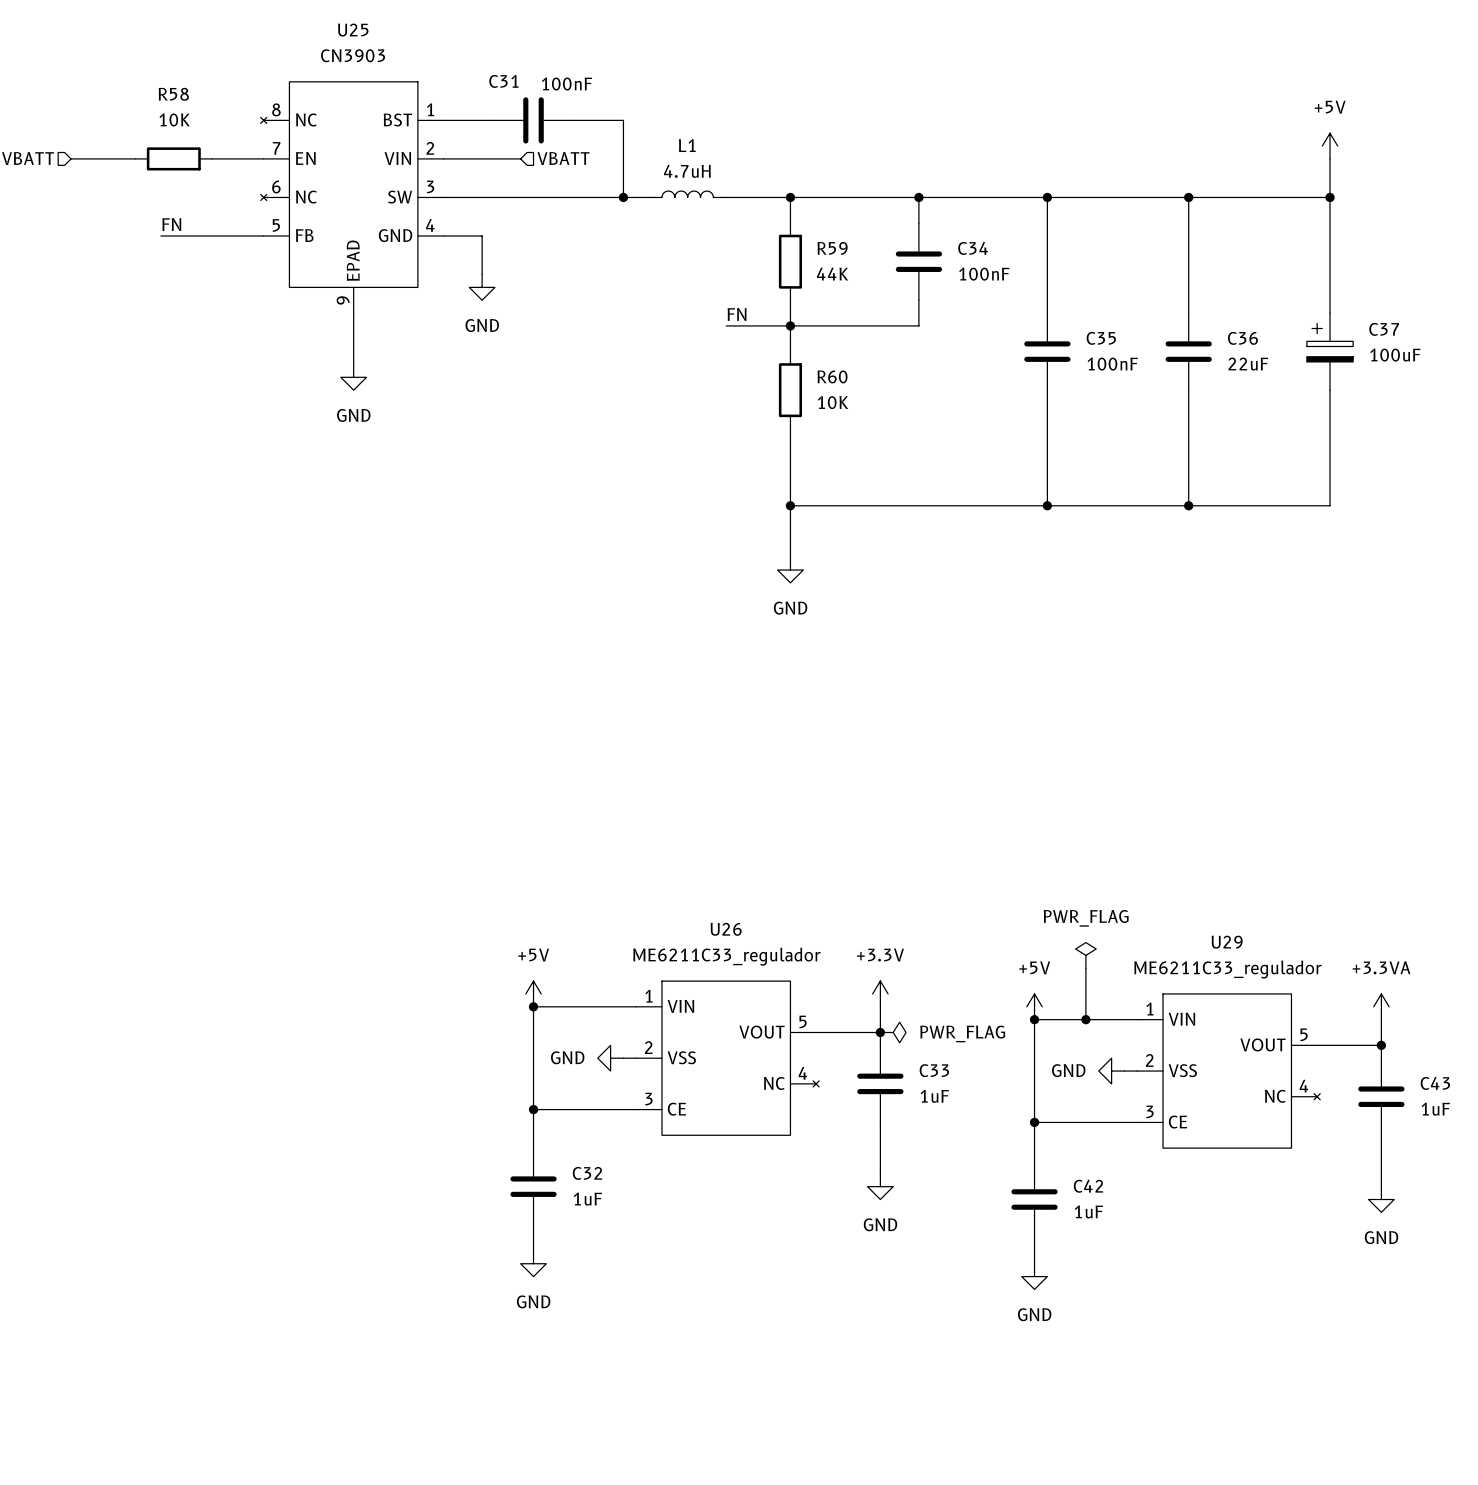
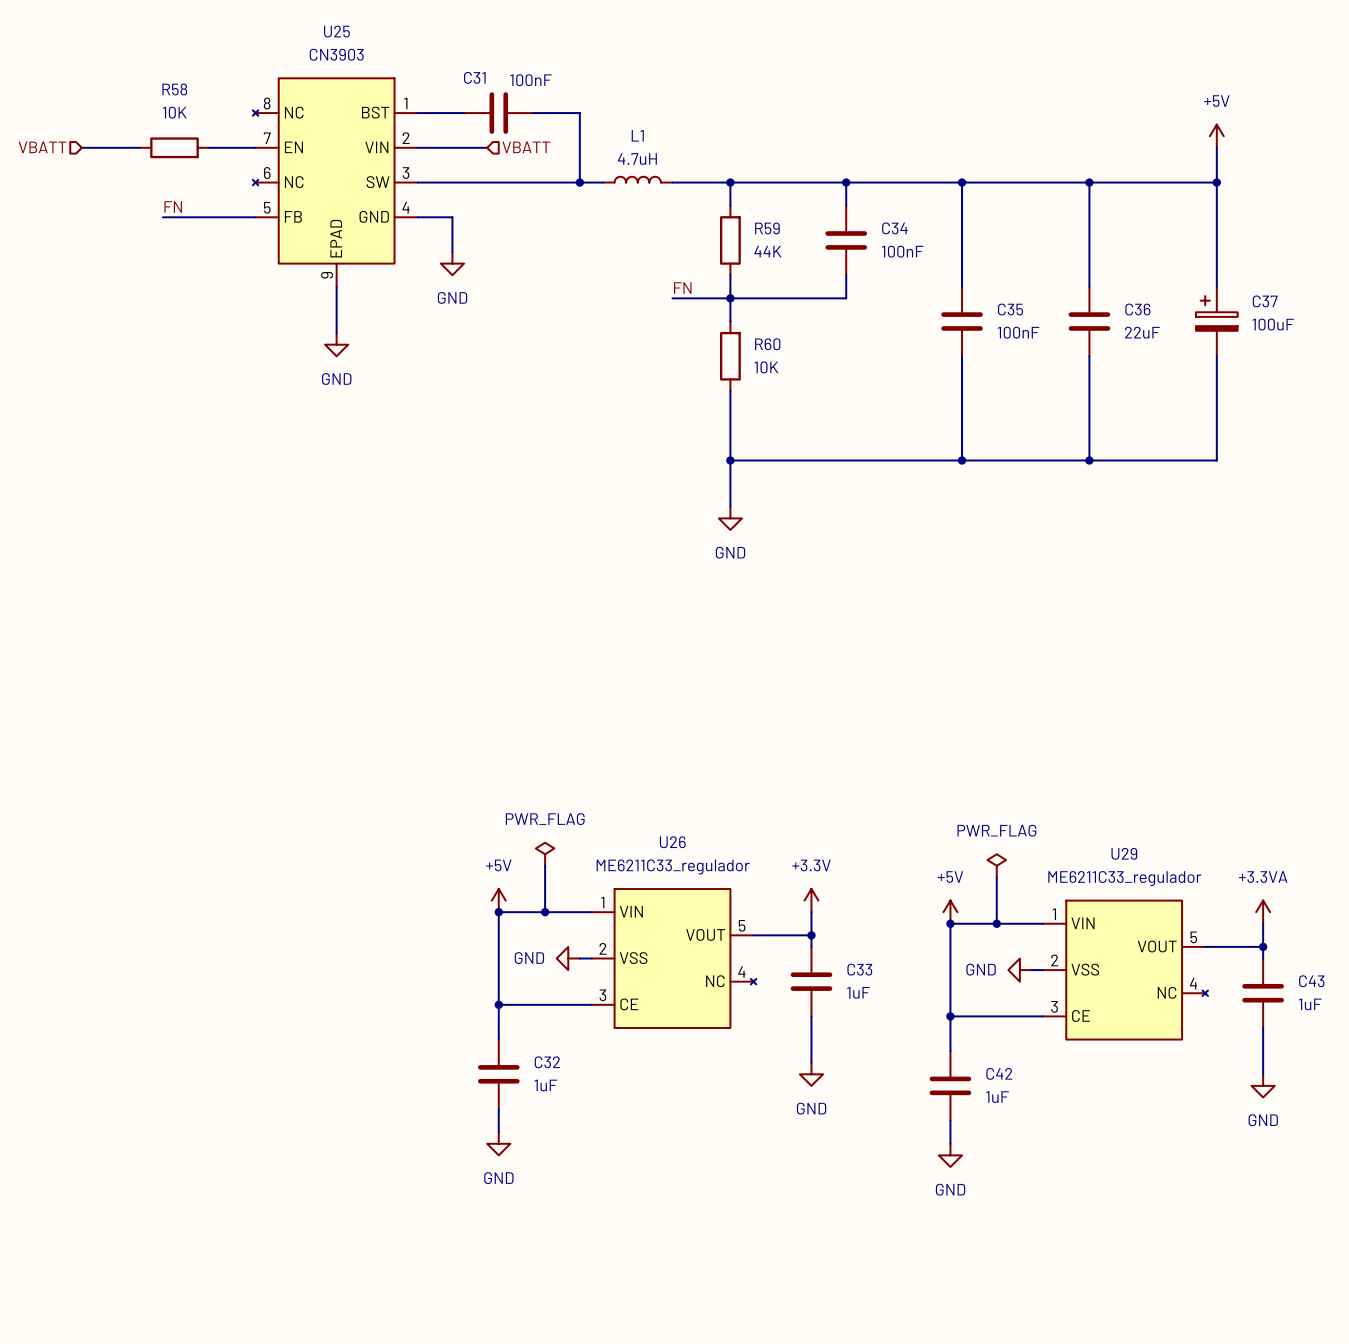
power symbol: none -> PWR_FLAG (545, 854)
wire: none -> (545, 865) (545, 912)
junction: none -> (545, 912)
power symbol: PWR_FLAG (893, 1032) -> none

